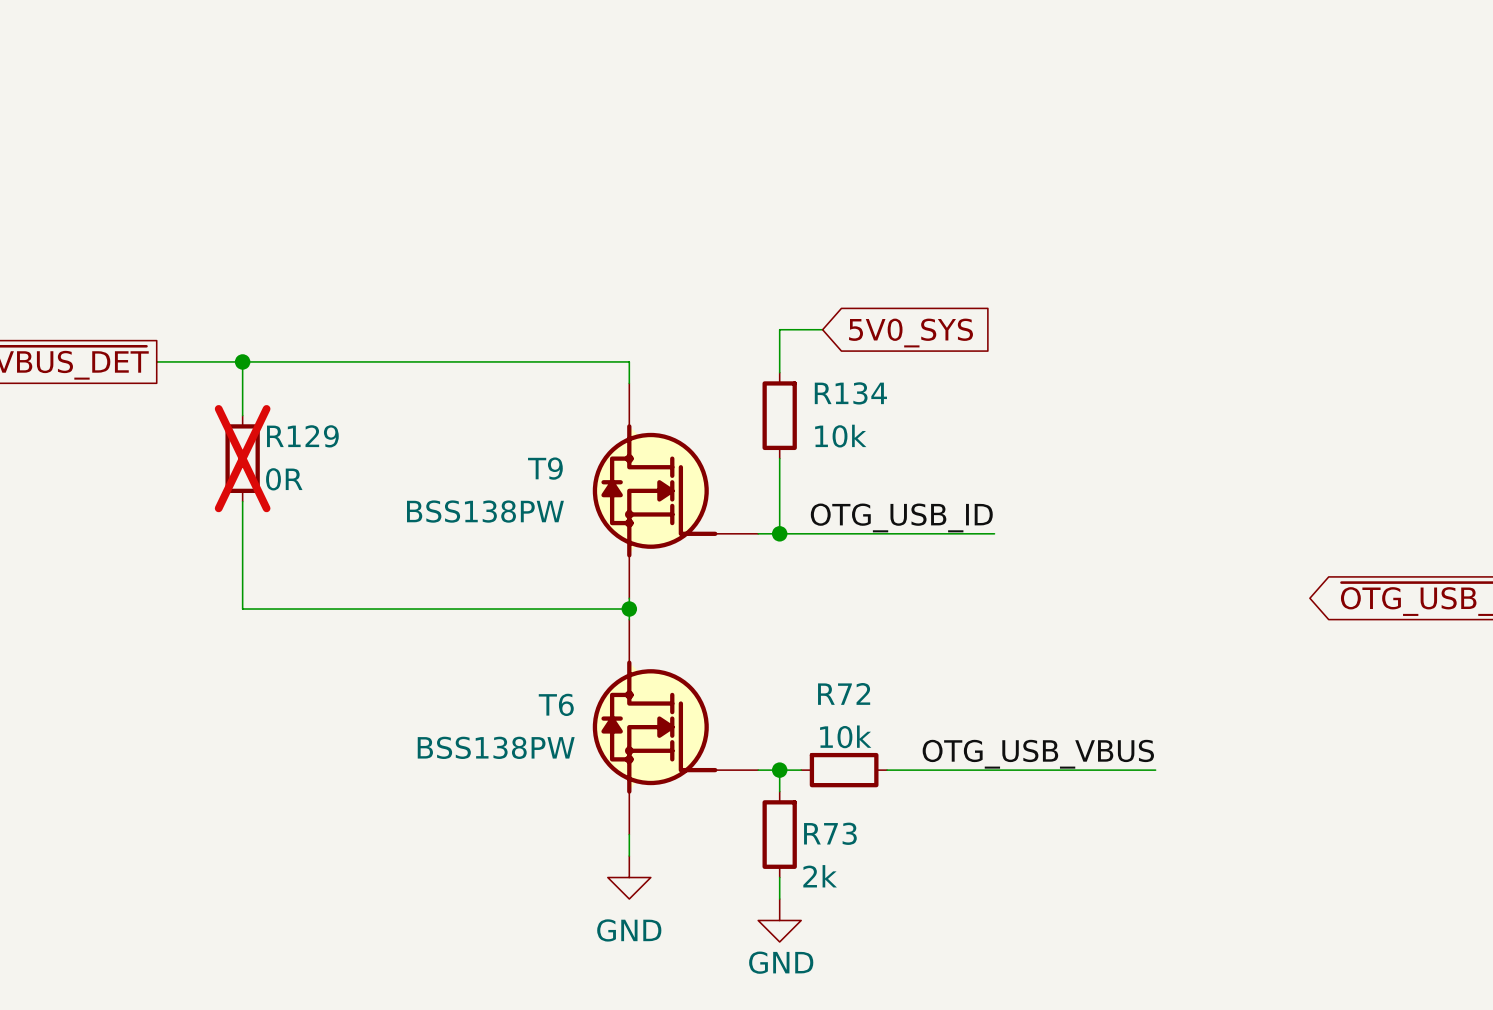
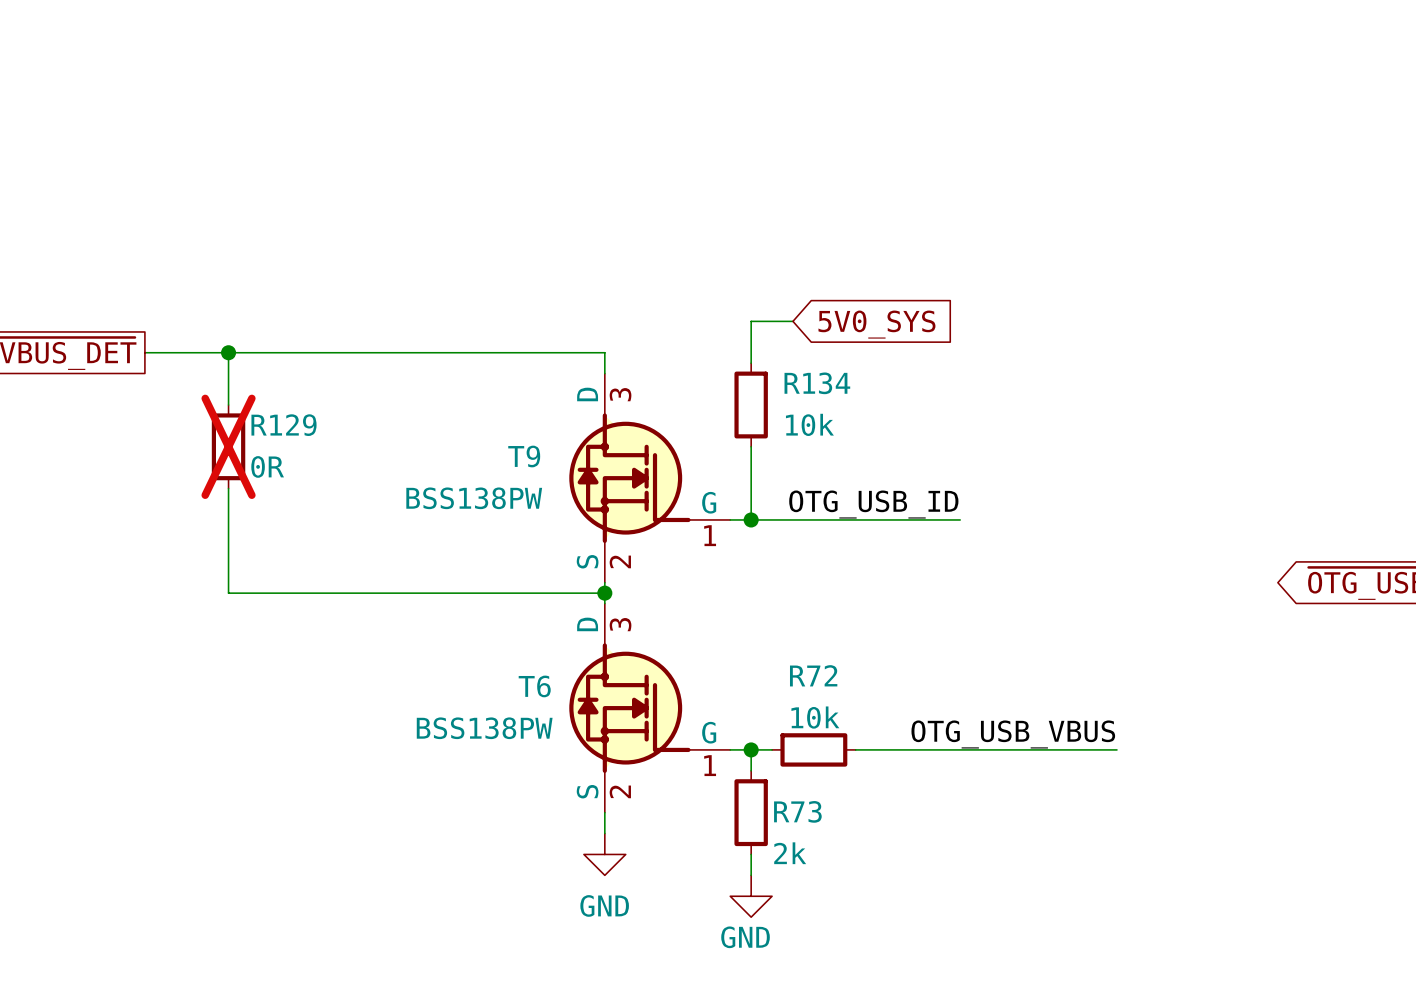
T9 pin name: none -> D (587, 394)
T9 pin number: none -> 3 (620, 394)
T9 pin name: none -> G (709, 502)
T9 pin number: none -> 1 (710, 535)
T9 pin name: none -> S (587, 561)
T9 pin number: none -> 2 (620, 561)
T6 pin name: none -> D (587, 624)
T6 pin number: none -> 3 (620, 624)
T6 pin name: none -> G (709, 732)
T6 pin number: none -> 1 (710, 765)
T6 pin name: none -> S (587, 791)
T6 pin number: none -> 2 (620, 791)

